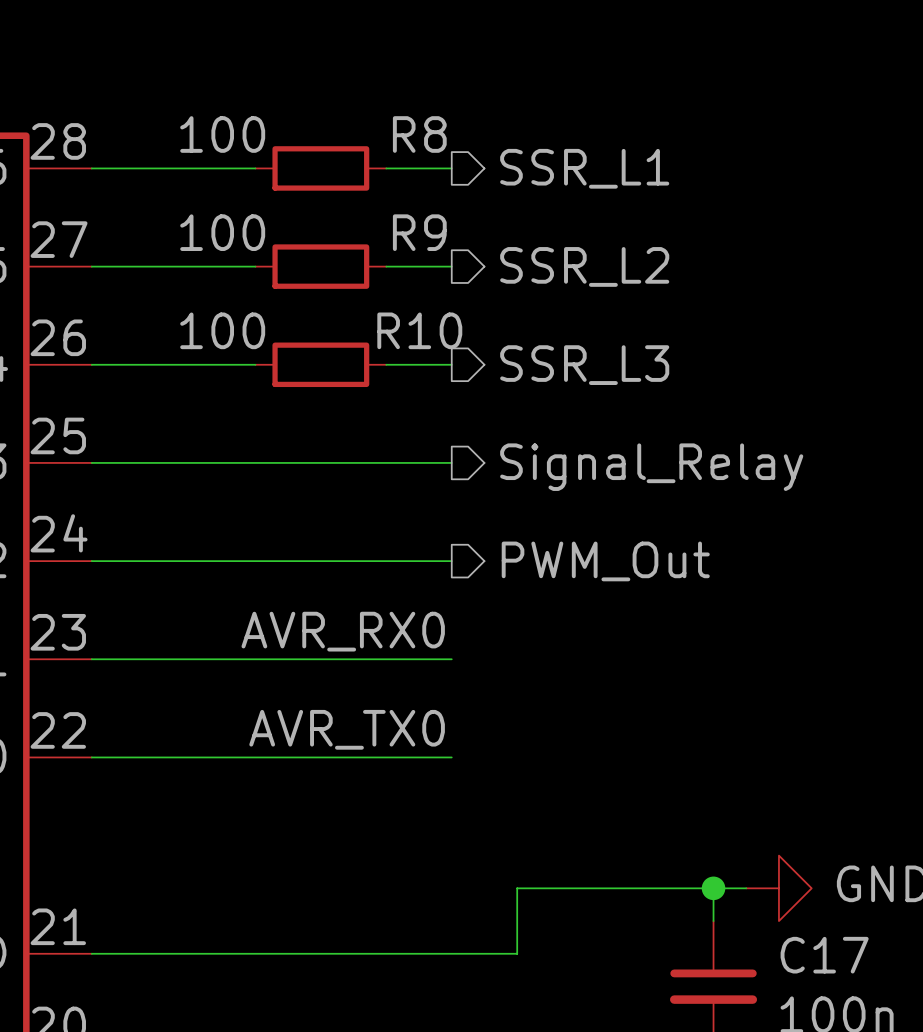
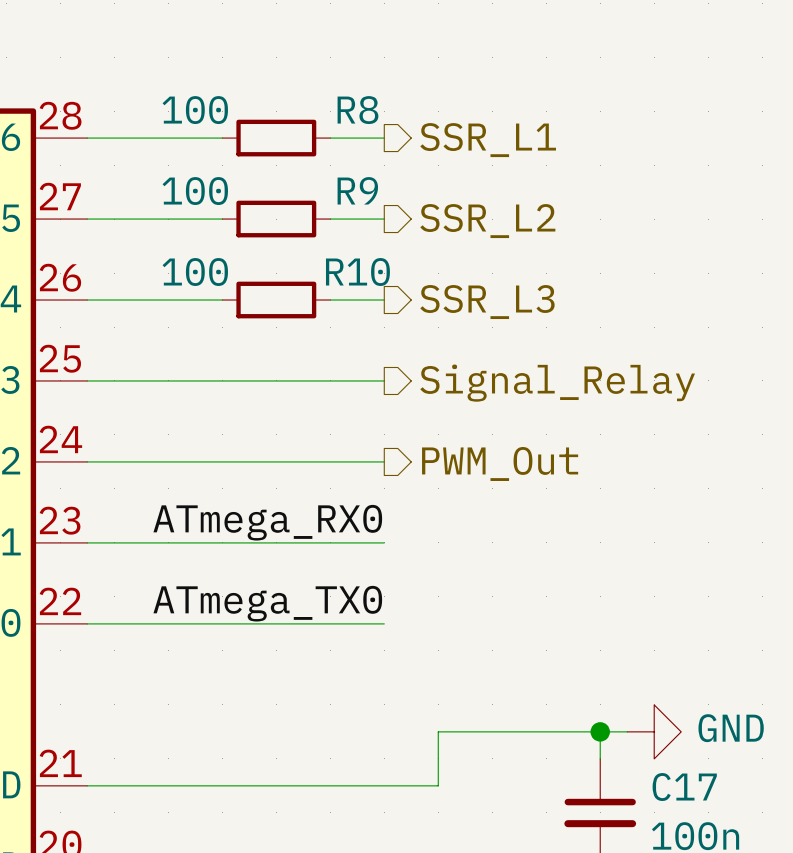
label: AVR_RX0 (343, 631) -> ATmega_RX0 (267, 522)
label: AVR_TX0 (347, 729) -> ATmega_TX0 (267, 603)

